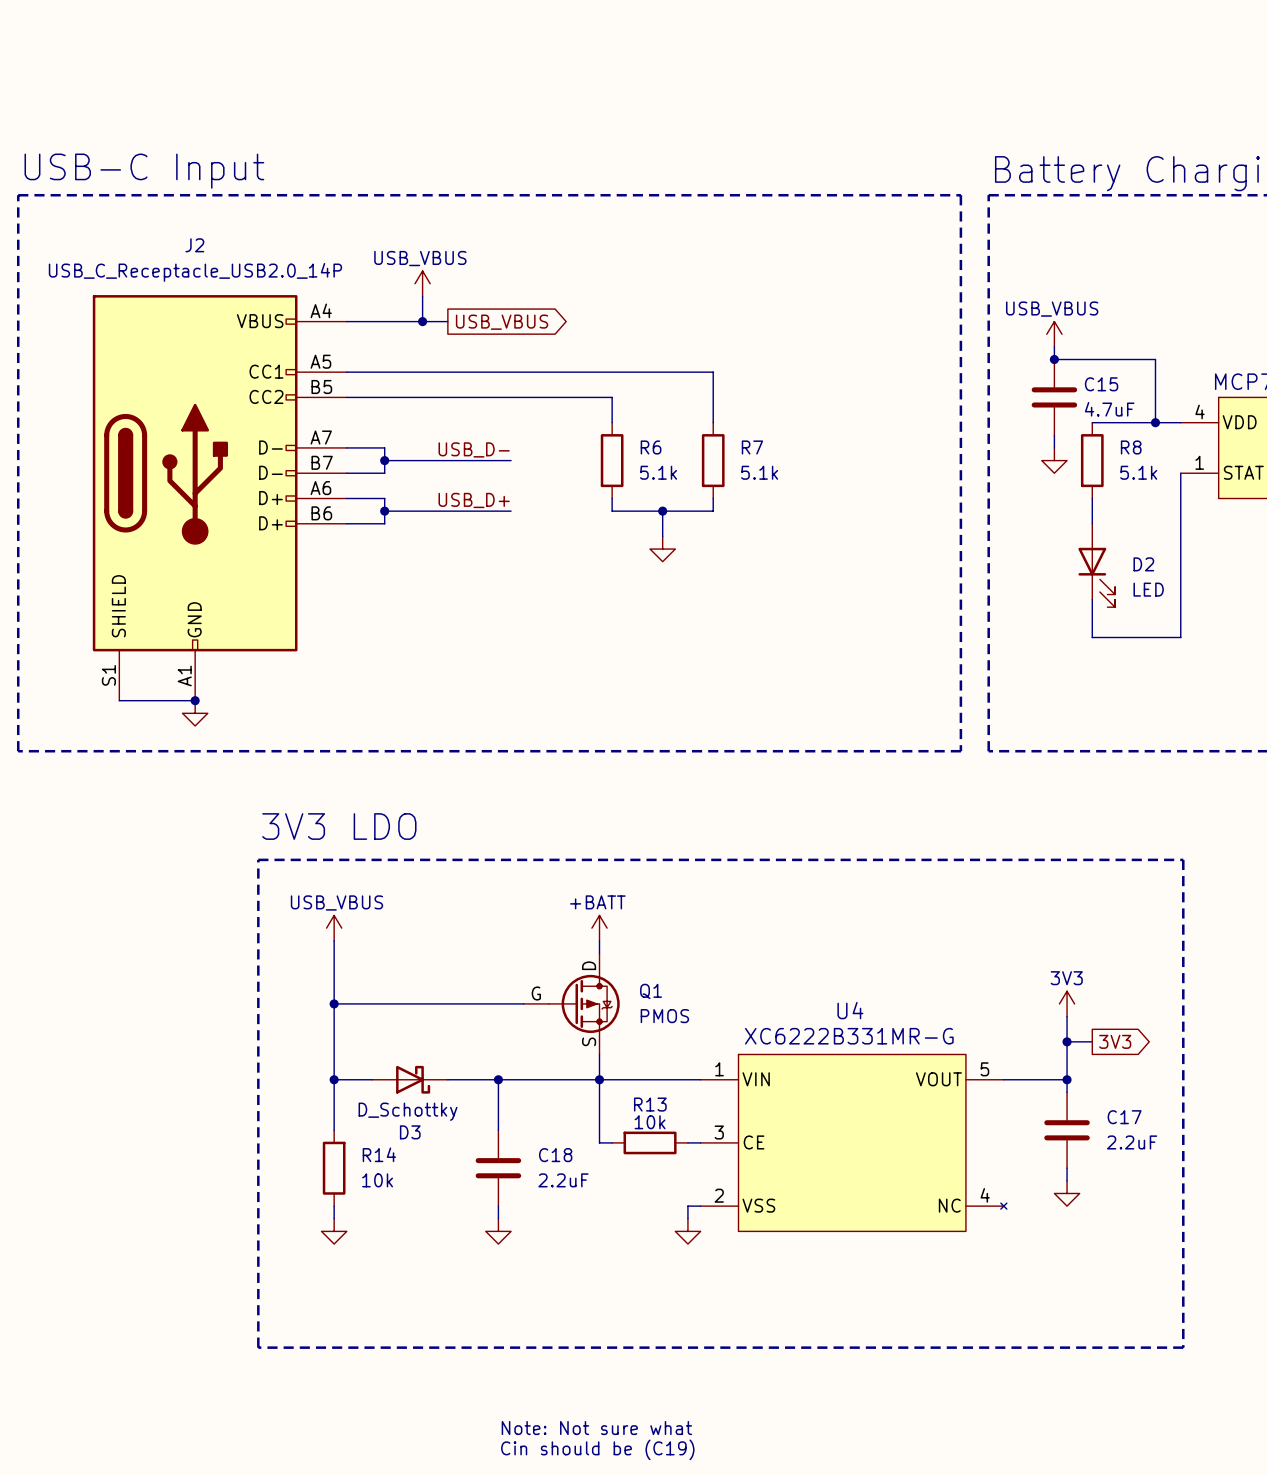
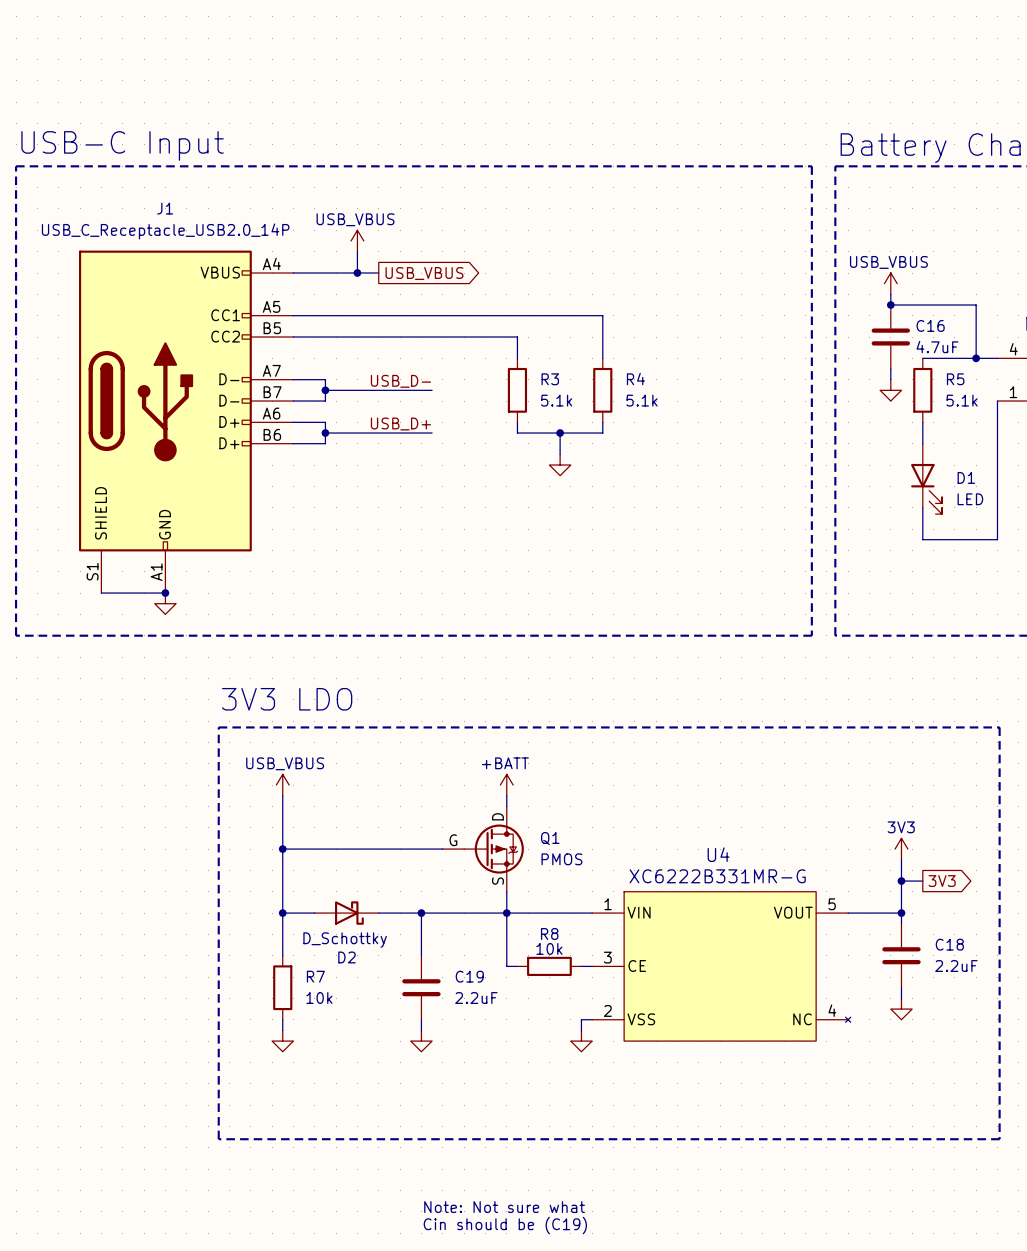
J2 name: J2 (194, 245) -> J1 (165, 208)
C15 name: C15 (1101, 384) -> C16 (930, 325)
R6 name: R6 (651, 447) -> R3 (550, 379)
R7 name: R7 (752, 447) -> R4 (635, 379)
R8 name: R8 (1131, 447) -> R5 (955, 379)
D2 name: D2 (1143, 564) -> D1 (966, 477)
R13 name: R13 (650, 1104) -> R8 (549, 934)
C17 name: C17 (1124, 1117) -> C18 (949, 944)
D3 name: D3 (410, 1132) -> D2 (347, 957)
R14 name: R14 (379, 1154) -> R7 (315, 976)
C18 name: C18 (555, 1155) -> C19 (469, 976)

